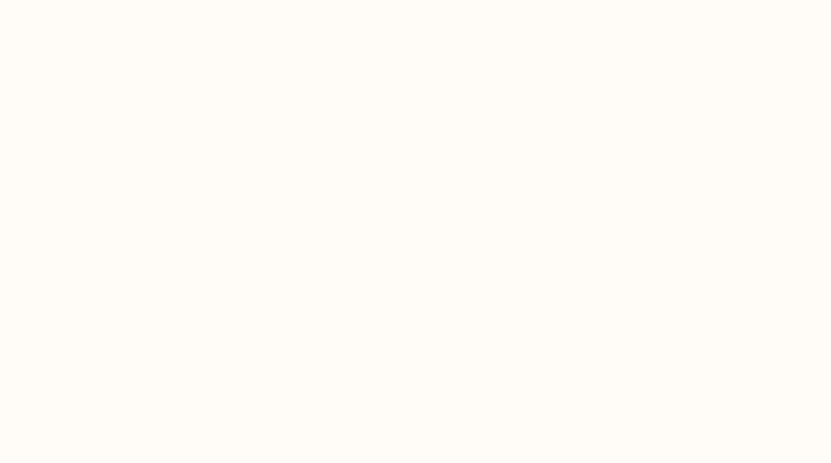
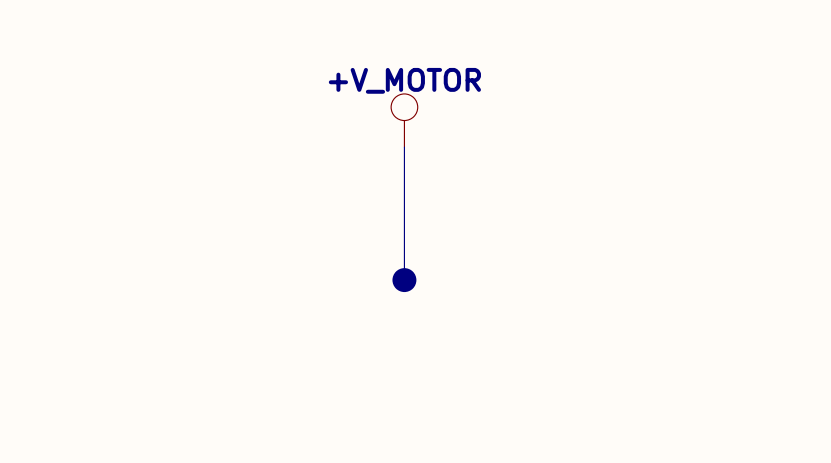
power symbol: none -> +V_MOTOR (404, 120)
wire: none -> (404, 147) (404, 280)
junction: none -> (404, 280)

